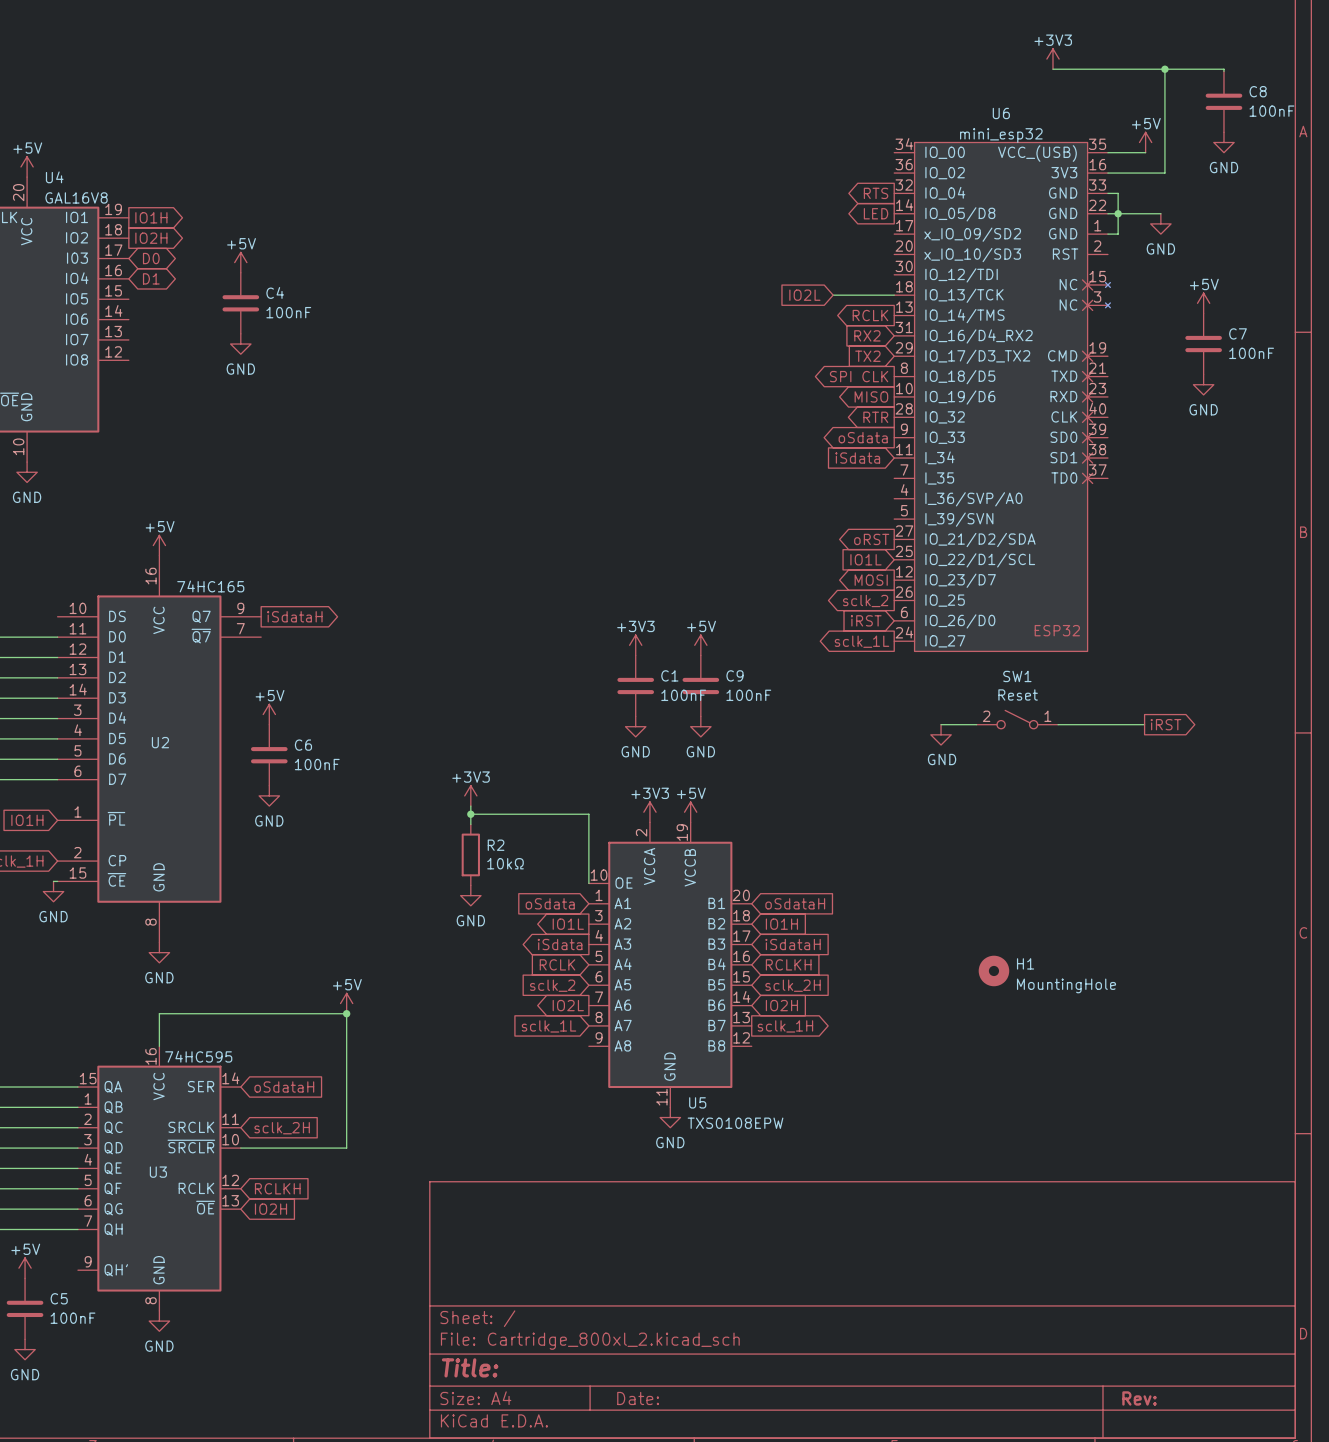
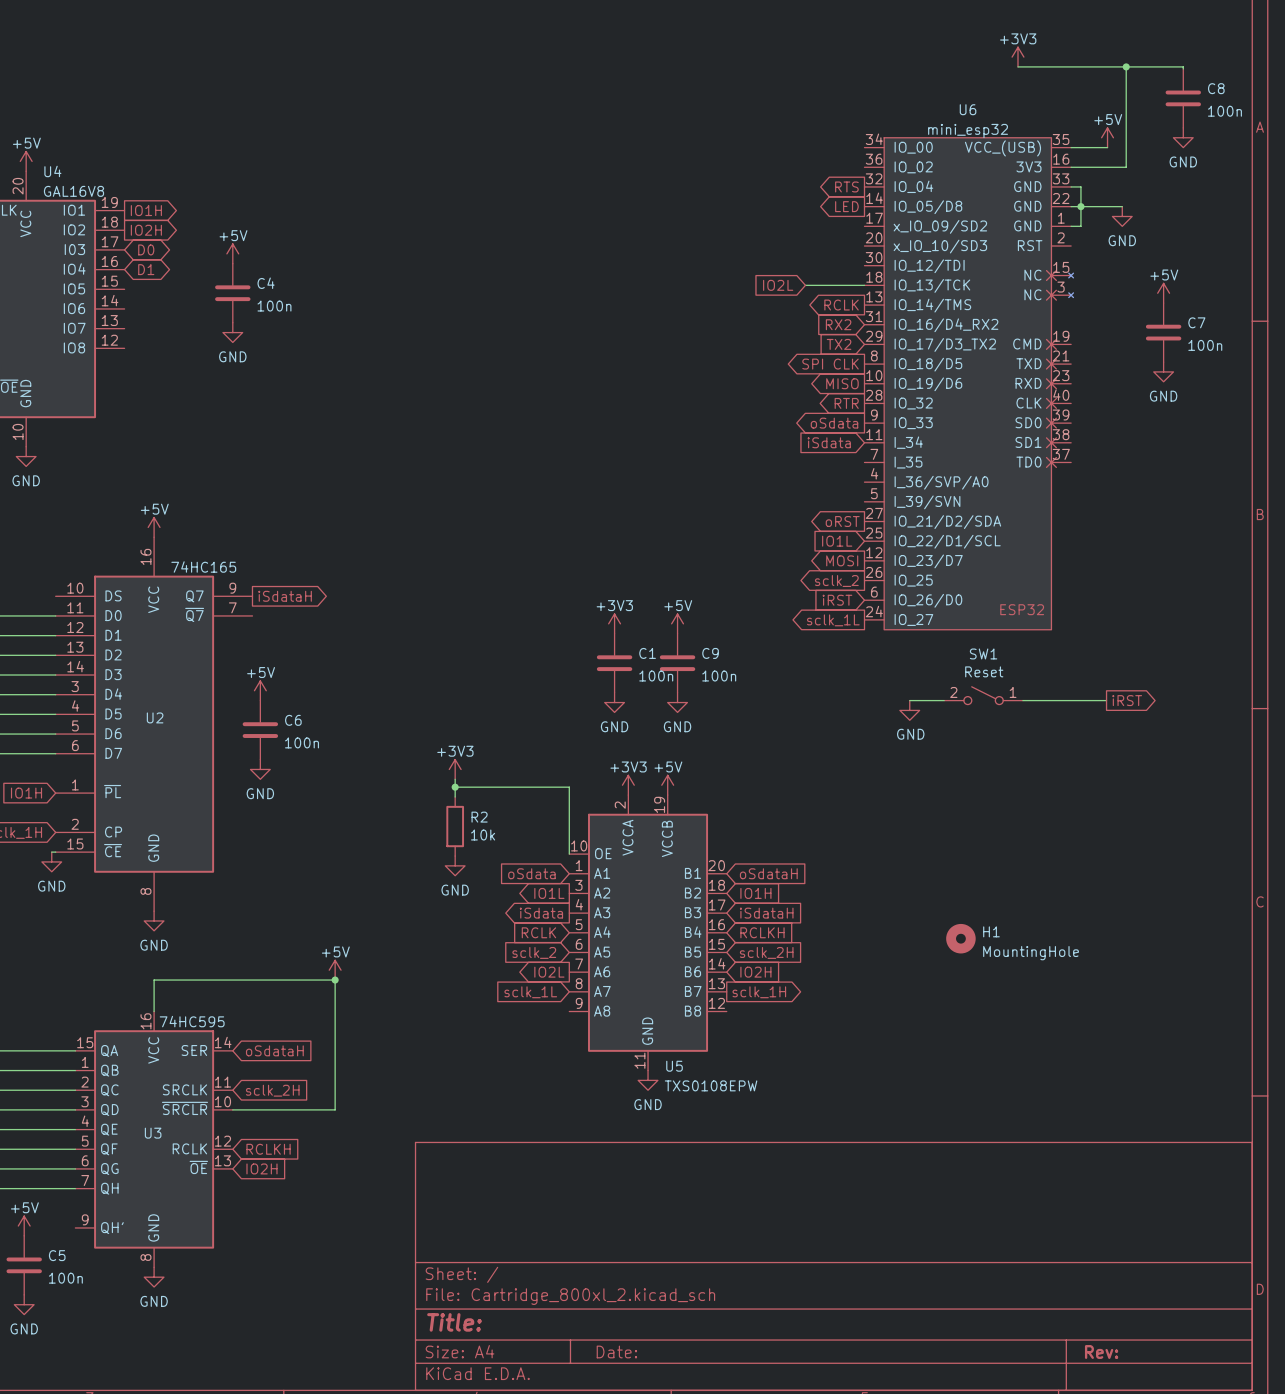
C8 value: 100nF (1271, 111) -> 100n (1224, 111)
C4 value: 100nF (288, 312) -> 100n (274, 306)
C7 value: 100nF (1251, 353) -> 100n (1205, 345)
C1 value: 100nF (683, 695) -> 100n (656, 676)
C9 value: 100nF (748, 695) -> 100n (719, 676)
C6 value: 100nF (317, 764) -> 100n (302, 742)
R2 value: 10kΩ (505, 863) -> 10k (483, 835)
C5 value: 100nF (73, 1318) -> 100n (65, 1278)

